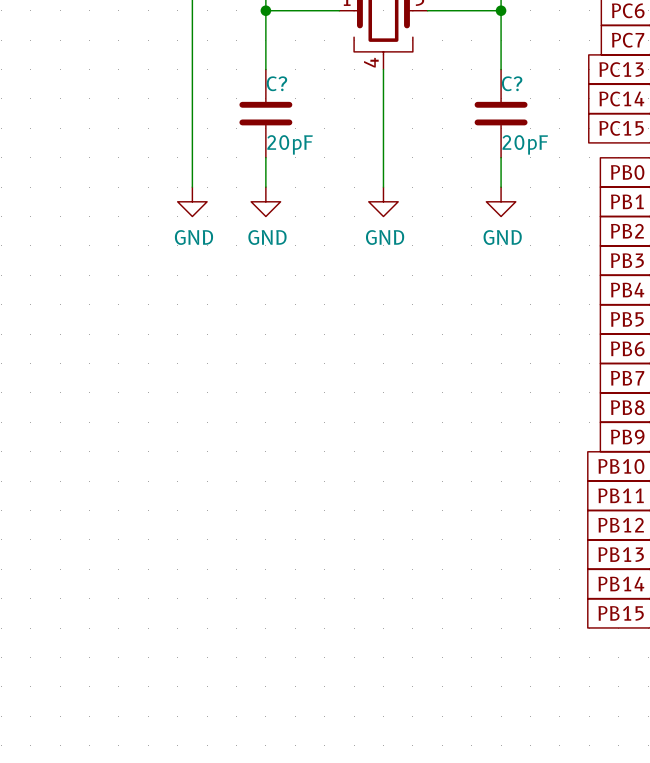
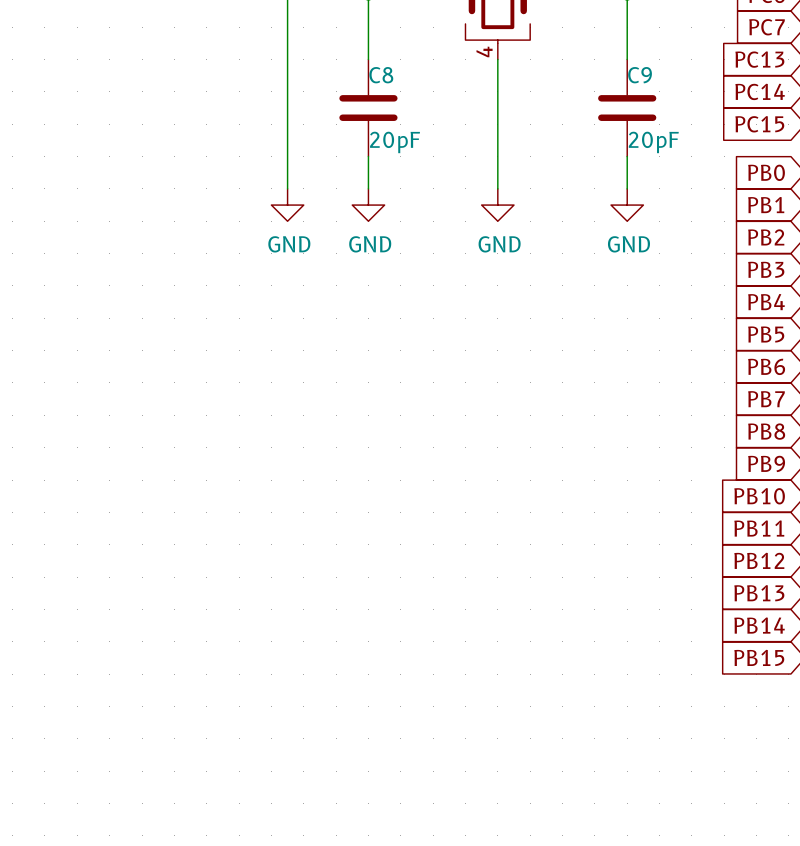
C? name: C? (276, 83) -> C8 (381, 75)
C? name: C? (512, 83) -> C9 (640, 75)

